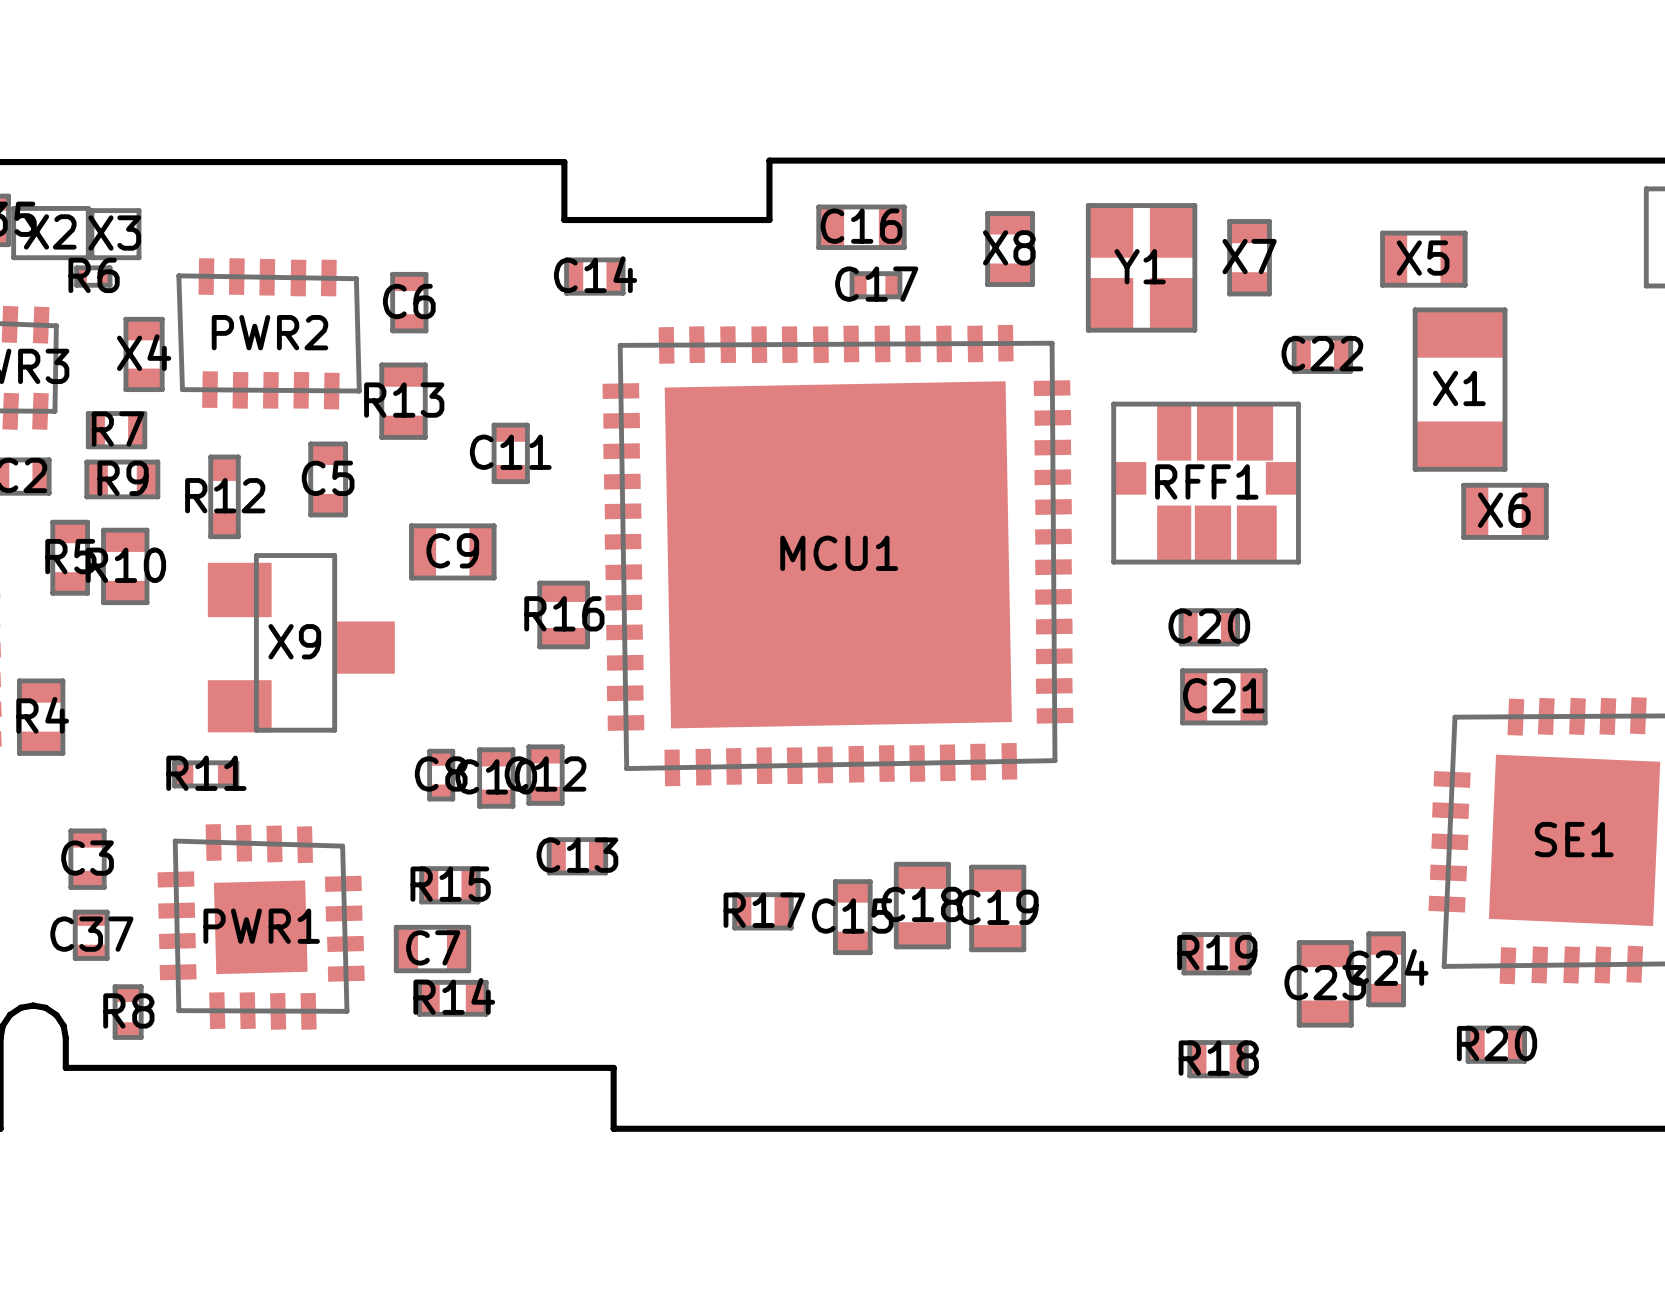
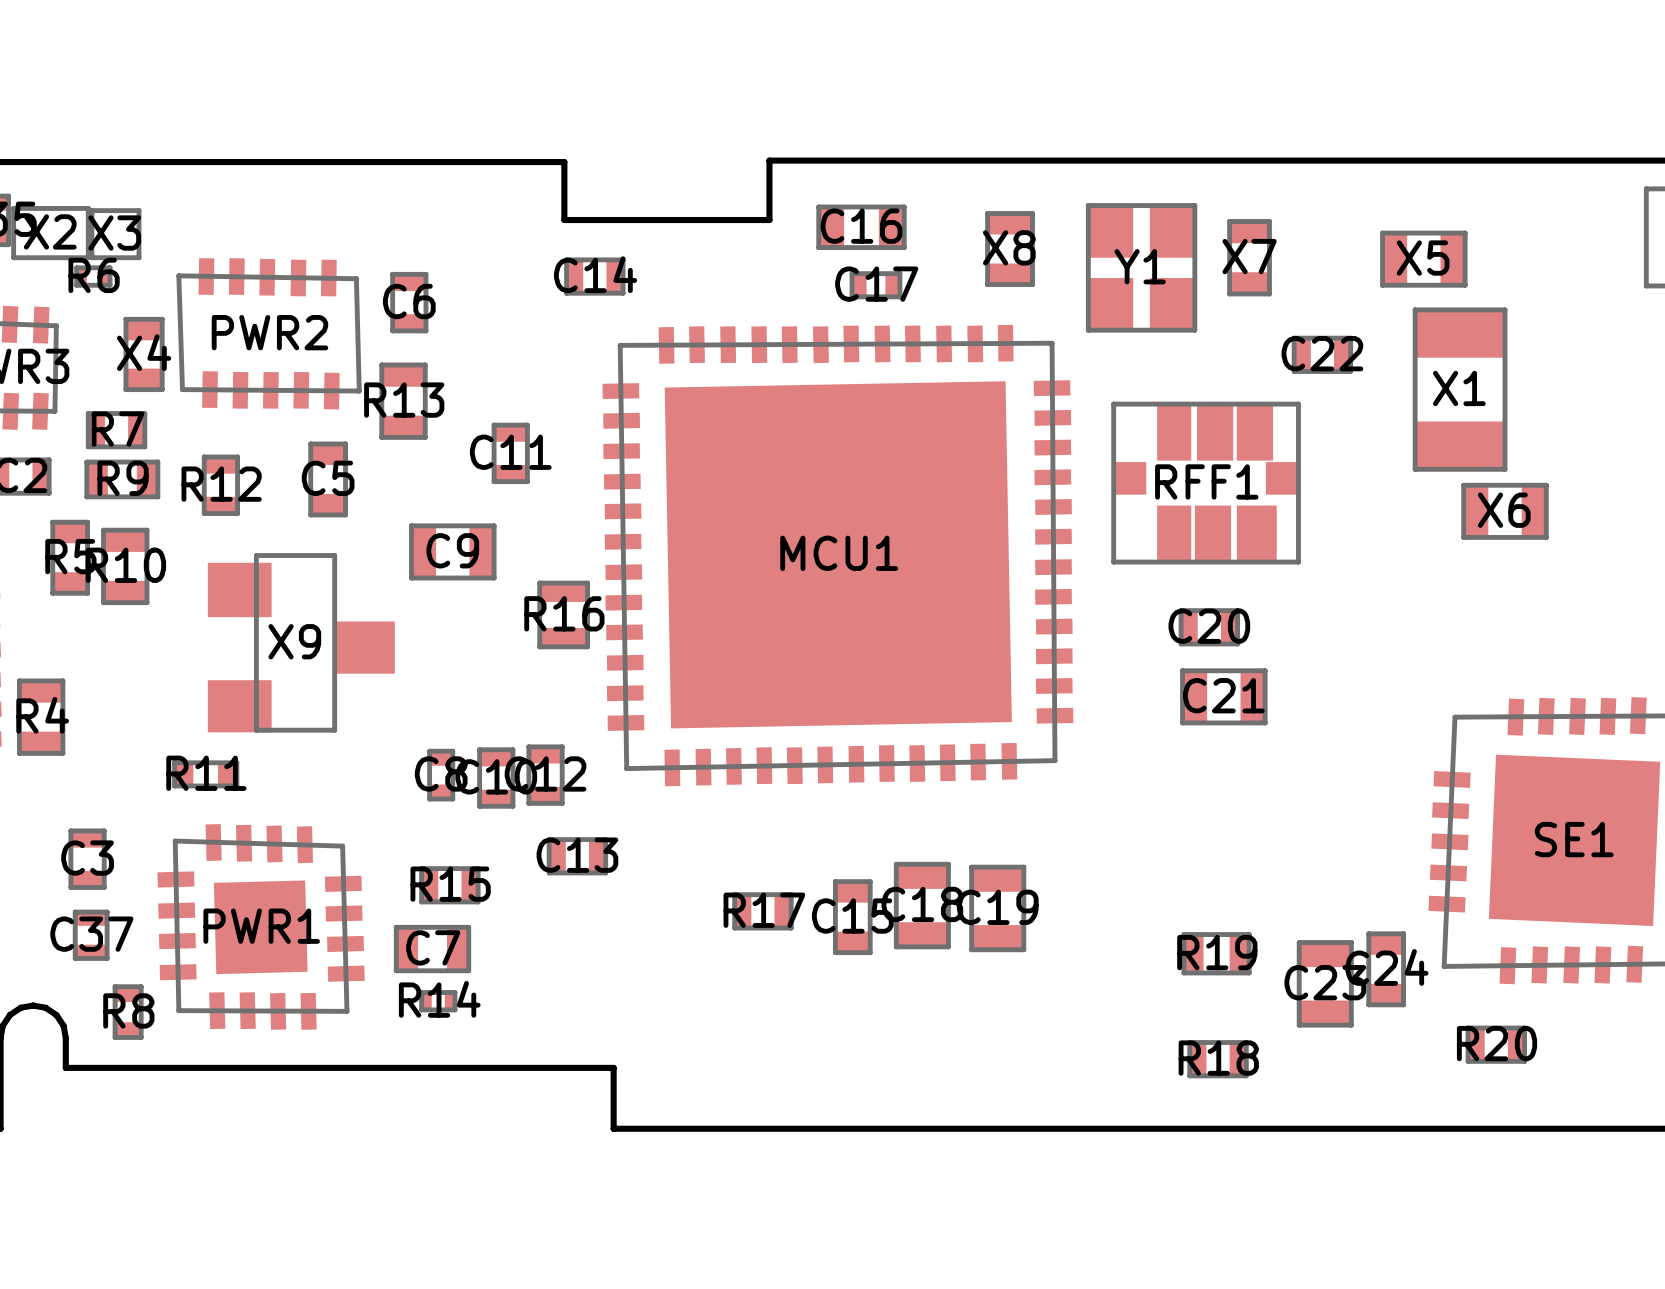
R12 footprint: [208, 454, 241, 540] -> [201, 454, 240, 516]
R12 name position: R12 (225, 495) -> R12 (221, 484)
R14 footprint: [417, 979, 489, 1017] -> [419, 990, 458, 1013]
R14 name position: R14 (454, 996) -> R14 (439, 999)

